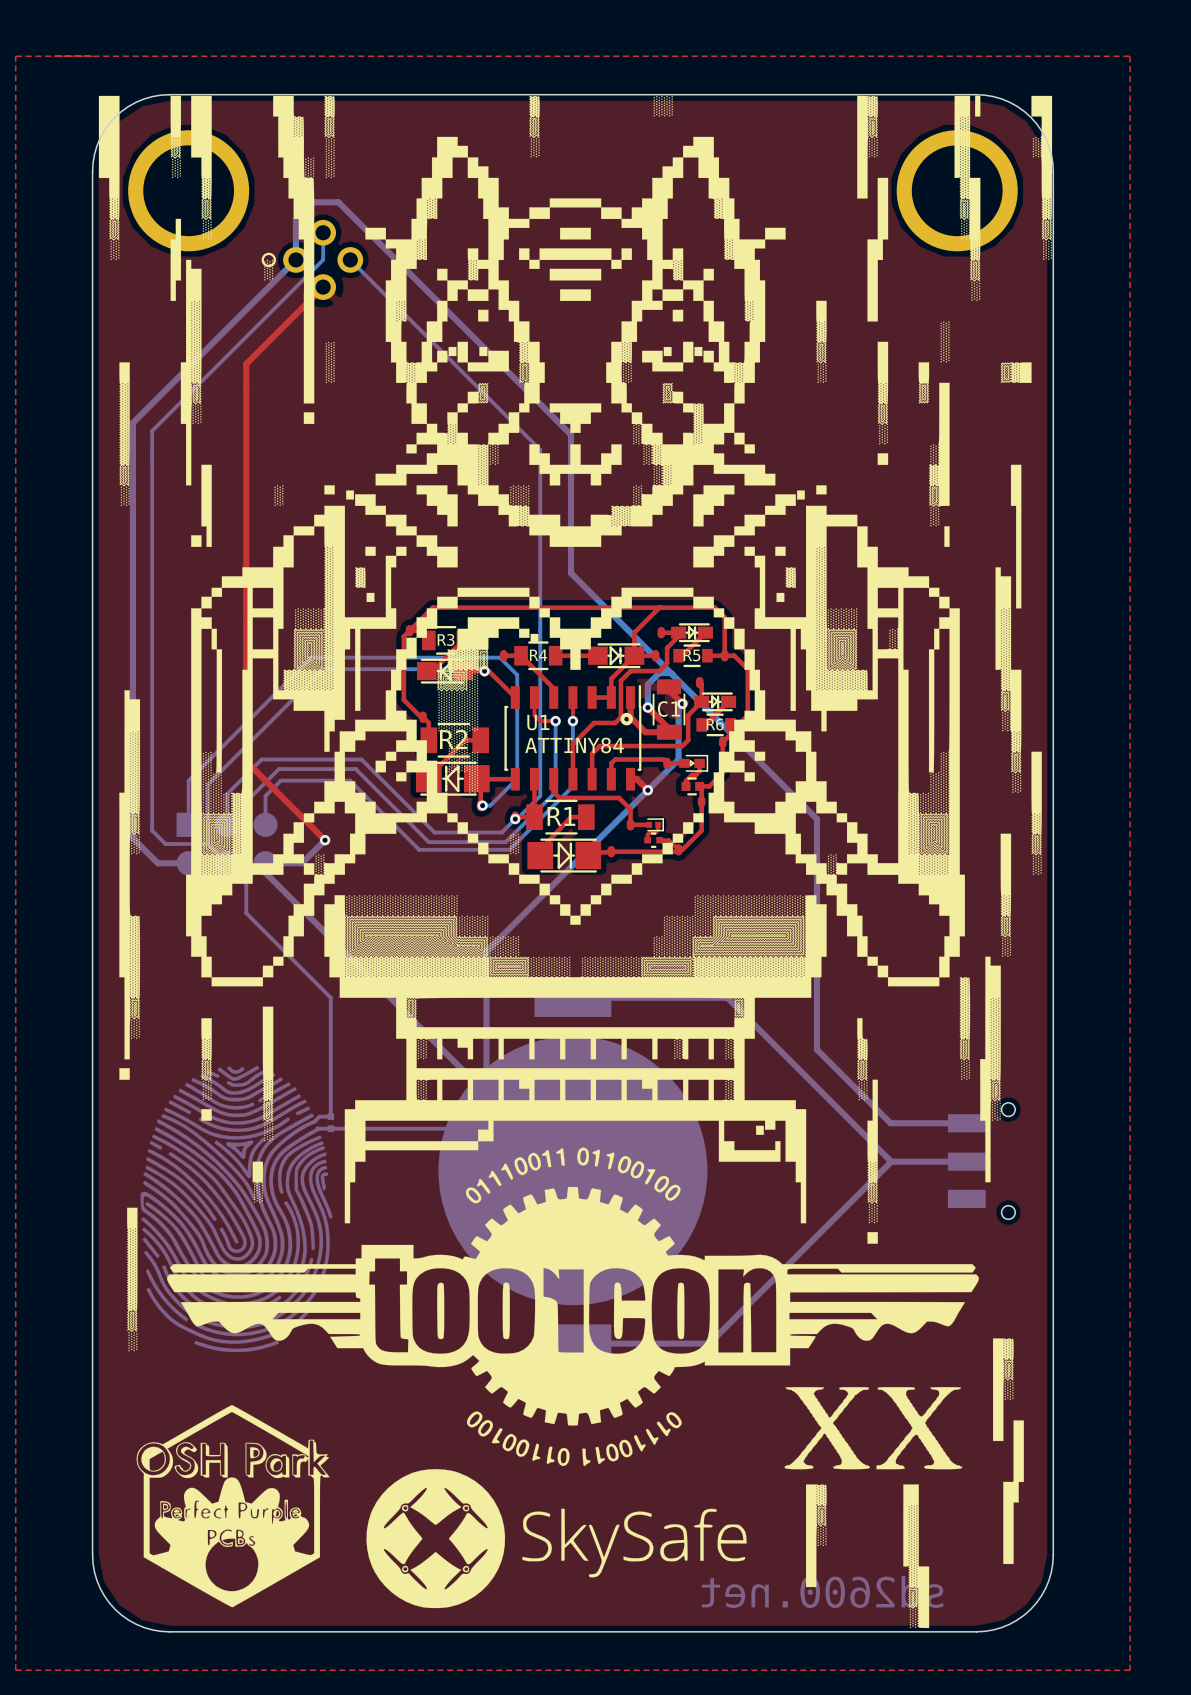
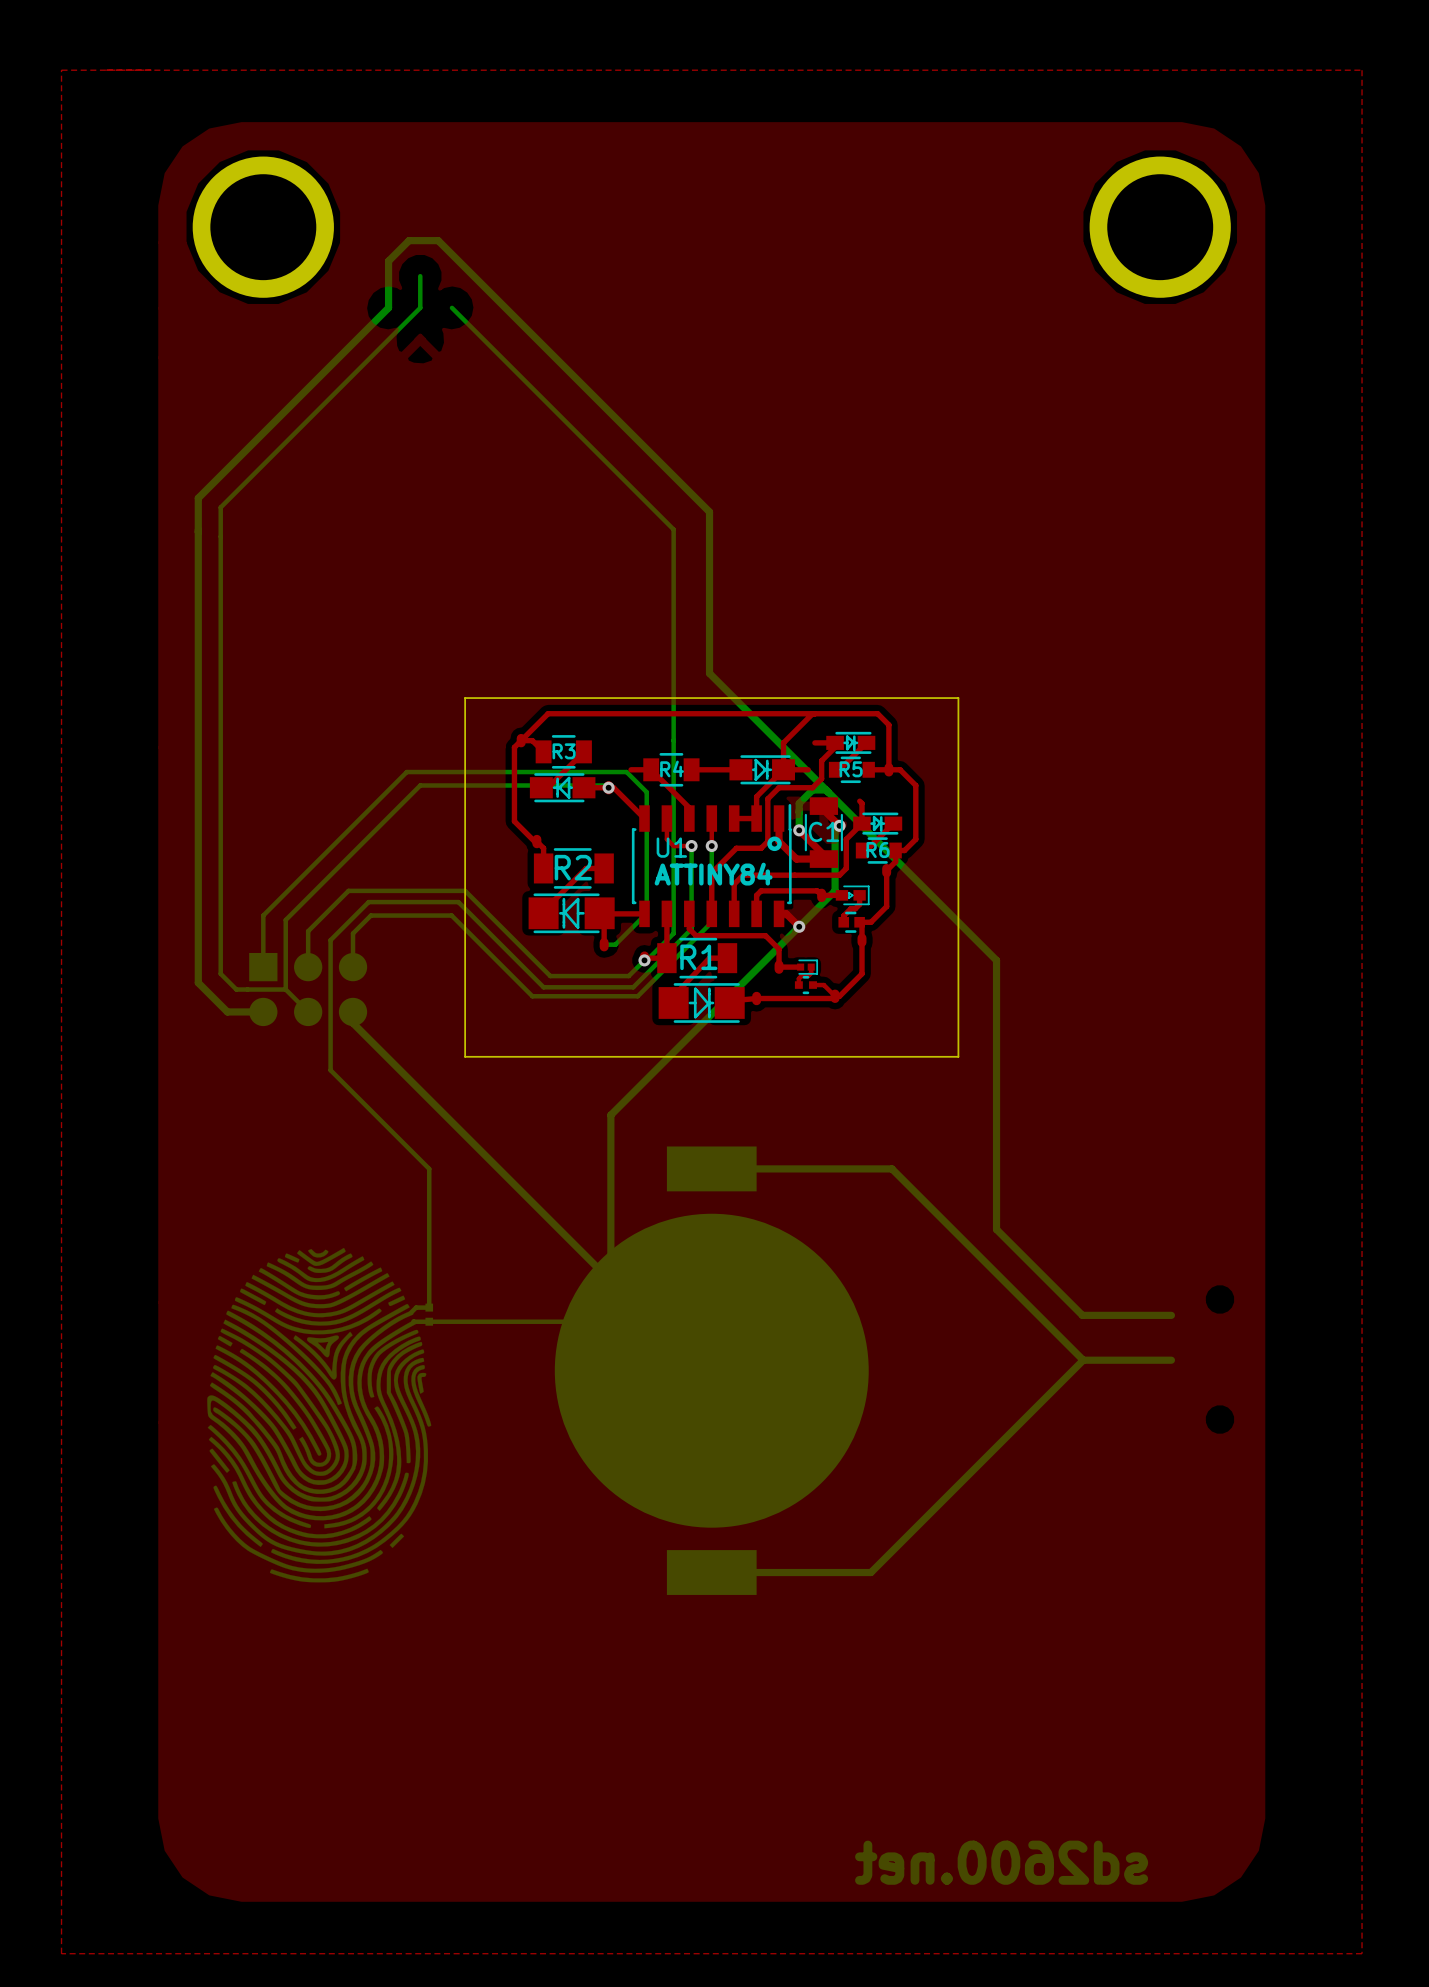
board edge: (169, 94) (976, 94) (1001, 99) (1017, 106) (1030, 117) (1045, 138) (1051, 154) (1053, 171) (1053, 1554) (1051, 1572) (1041, 1595) (1030, 1609) (1009, 1624) (993, 1629) (976, 1631) (169, 1631) (152, 1629) (128, 1620) (109, 1602) (100, 1588) (94, 1572) (92, 1554) (92, 171) (96, 146) (104, 130) (115, 117) (136, 102) (152, 96) (169, 94) -> none
drawing: [98, 95, 1053, 1629] -> none
part: (312, 259) -> none
top track: (323, 287) (246, 363) (246, 761) (325, 840) -> none
board edge: none -> (465, 698) (465, 1056) (958, 1056) (958, 698) (465, 698)
part: (661, 632) -> none
part: (503, 655) -> none
part: (655, 655) -> none
part: (699, 682) -> none
via: (482, 805) -> none
bottom track: (325, 840) (302, 863) (265, 863) -> none
via: (325, 840) -> none
part: (981, 1161) -> none

